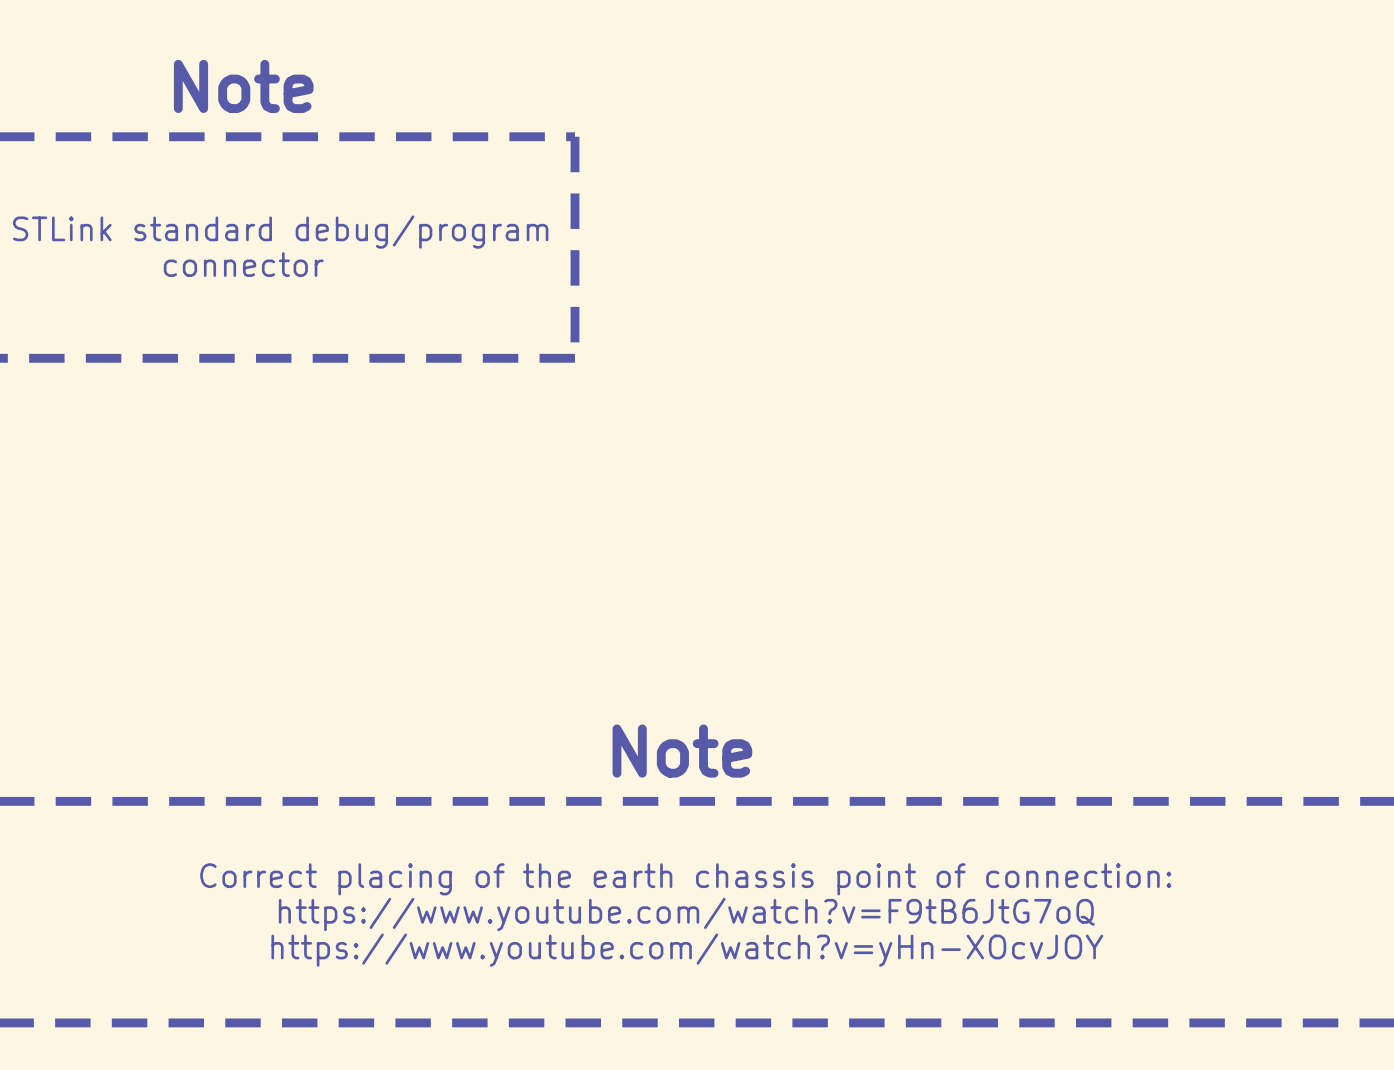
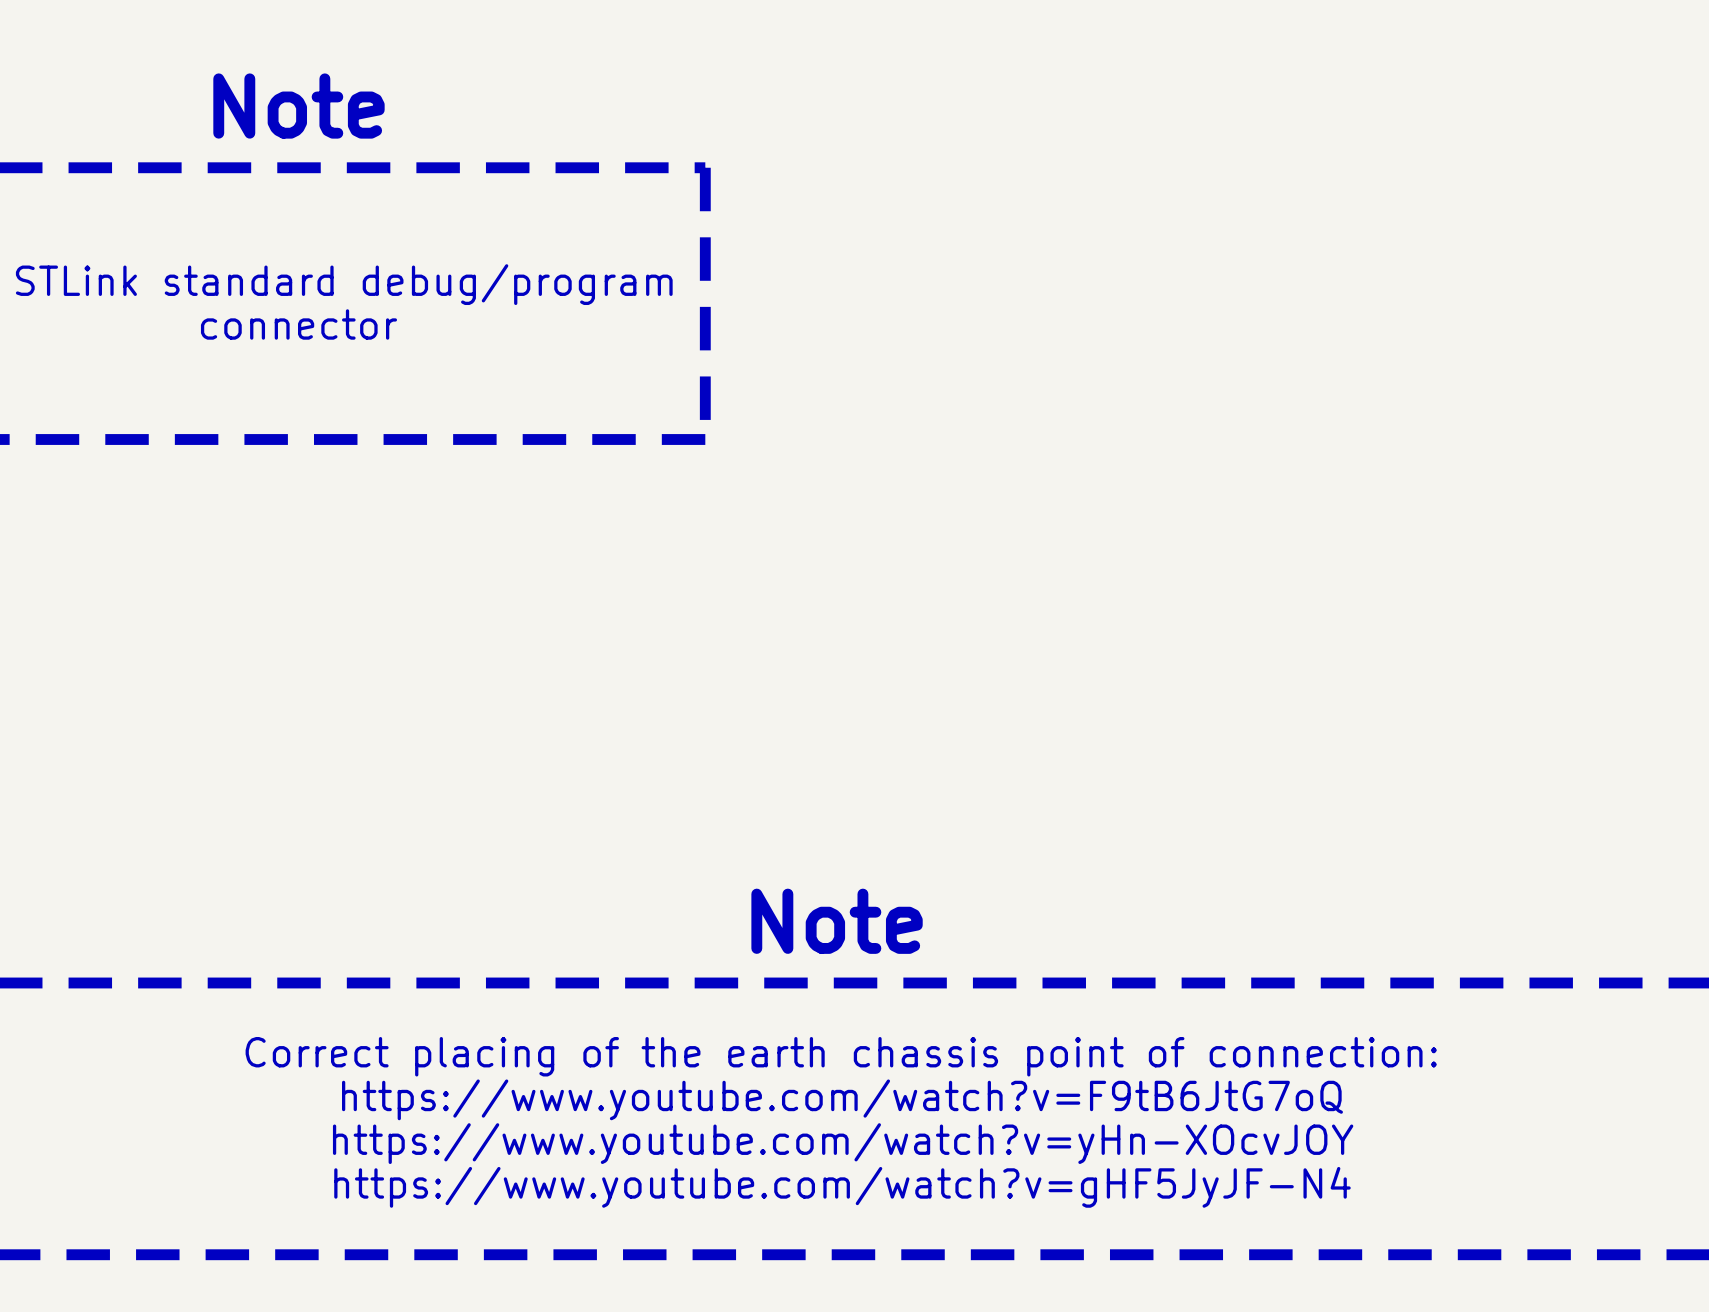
text position: Correct placing of the earth chassis point of connection: (685, 879) -> Correct placing of the earth chassis point of connection: (841, 1056)
text position: https://www.youtube.com/watch?v=F9tB6JtG7oQ (686, 914) -> https://www.youtube.com/watch?v=F9tB6JtG7oQ (842, 1099)
text position: https://www.youtube.com/watch?v=yHn-XOcvJOY (687, 950) -> https://www.youtube.com/watch?v=yHn-XOcvJOY (843, 1143)
text: none -> https://www.youtube.com/watch?v=gHF5JyJF-N4 (842, 1187)

